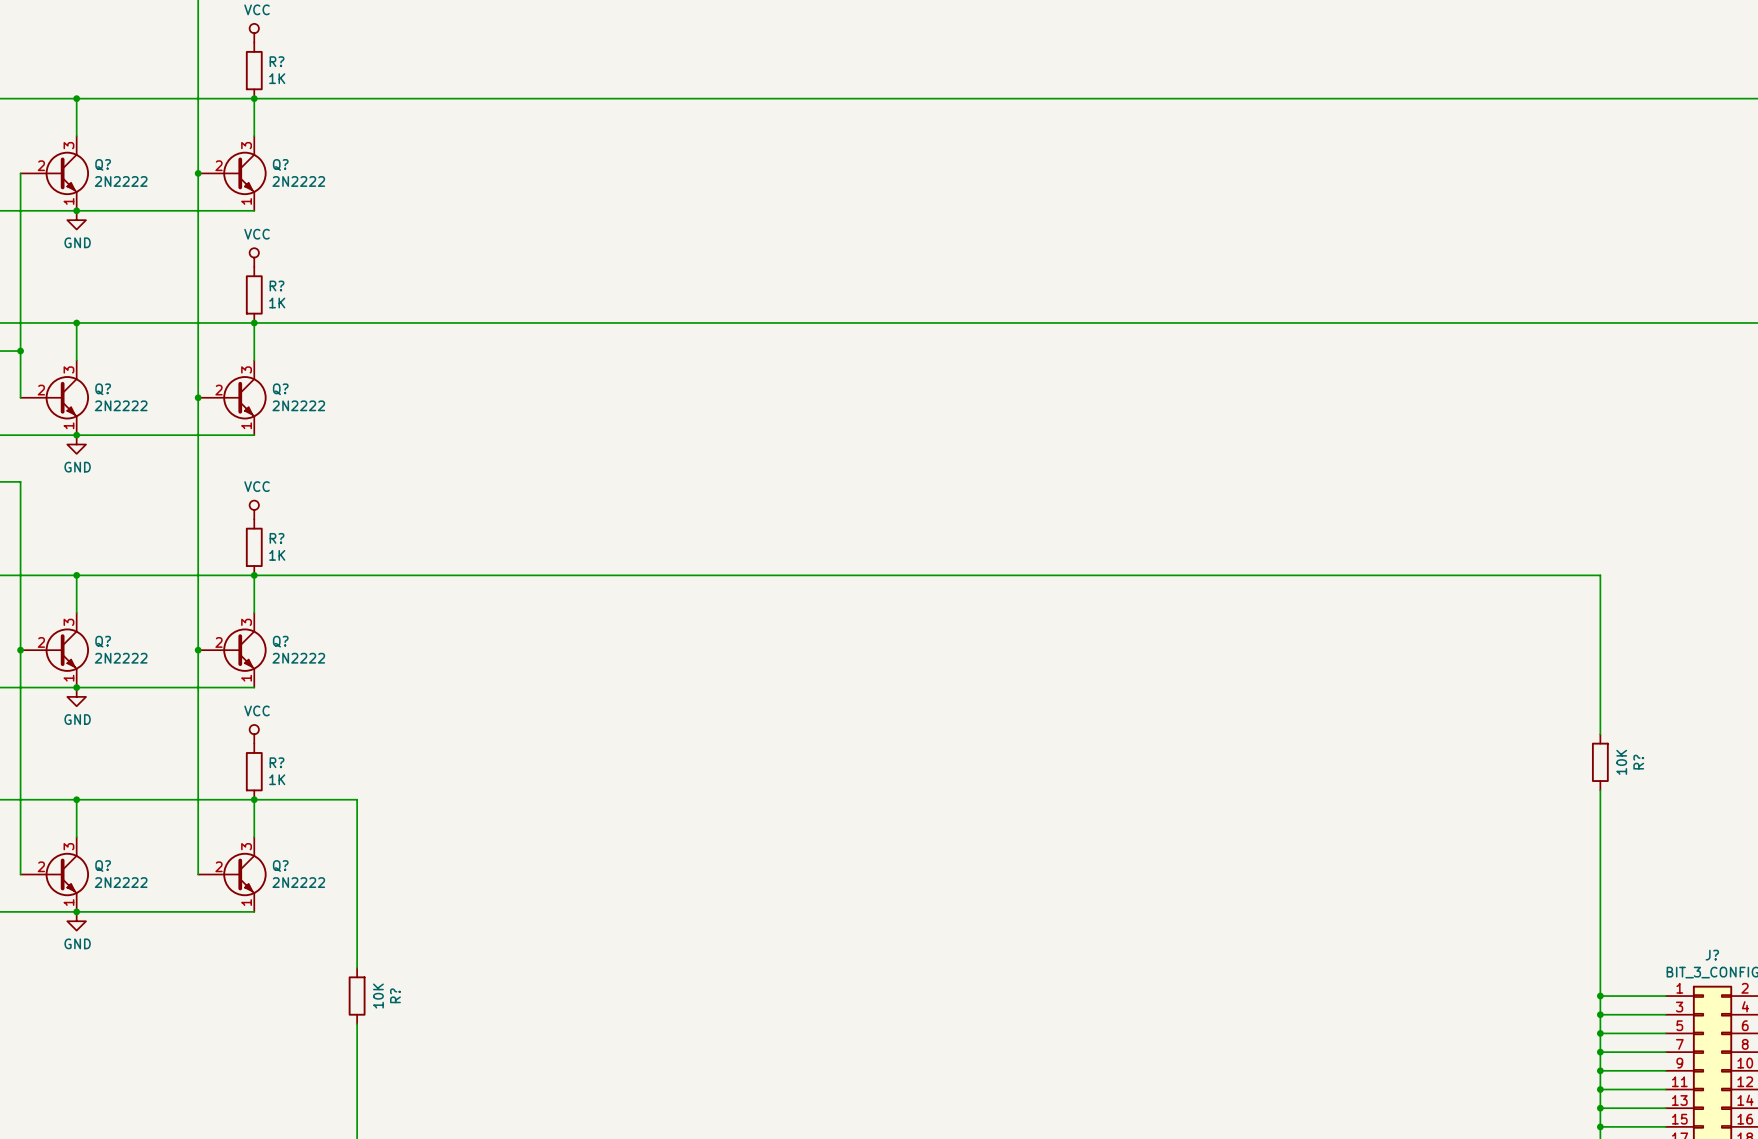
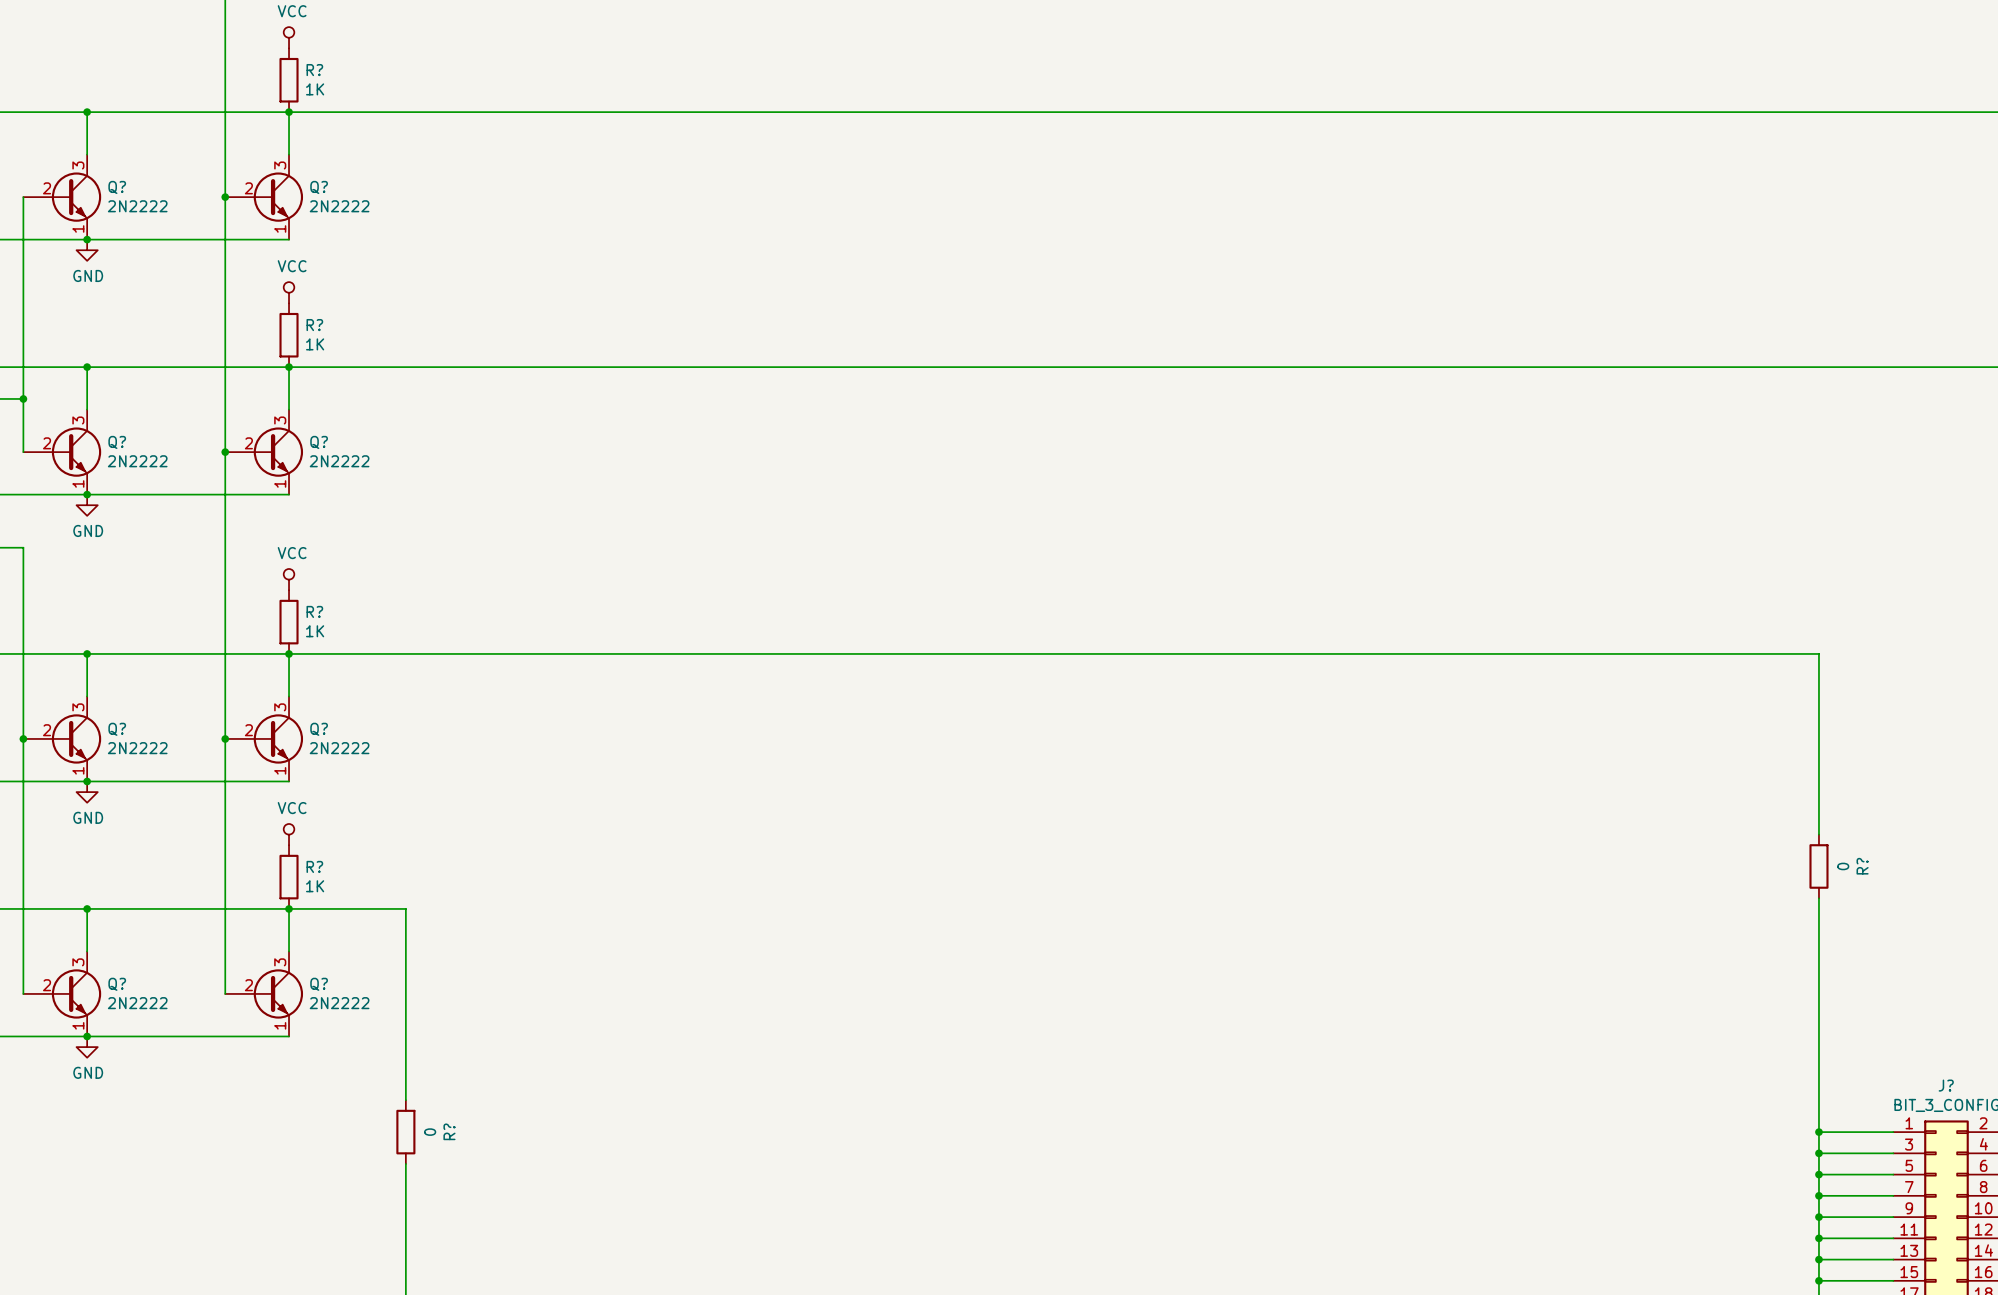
R? value: 10K (1621, 762) -> 0 (1843, 866)
R? value: 10K (378, 996) -> 0 (430, 1132)

